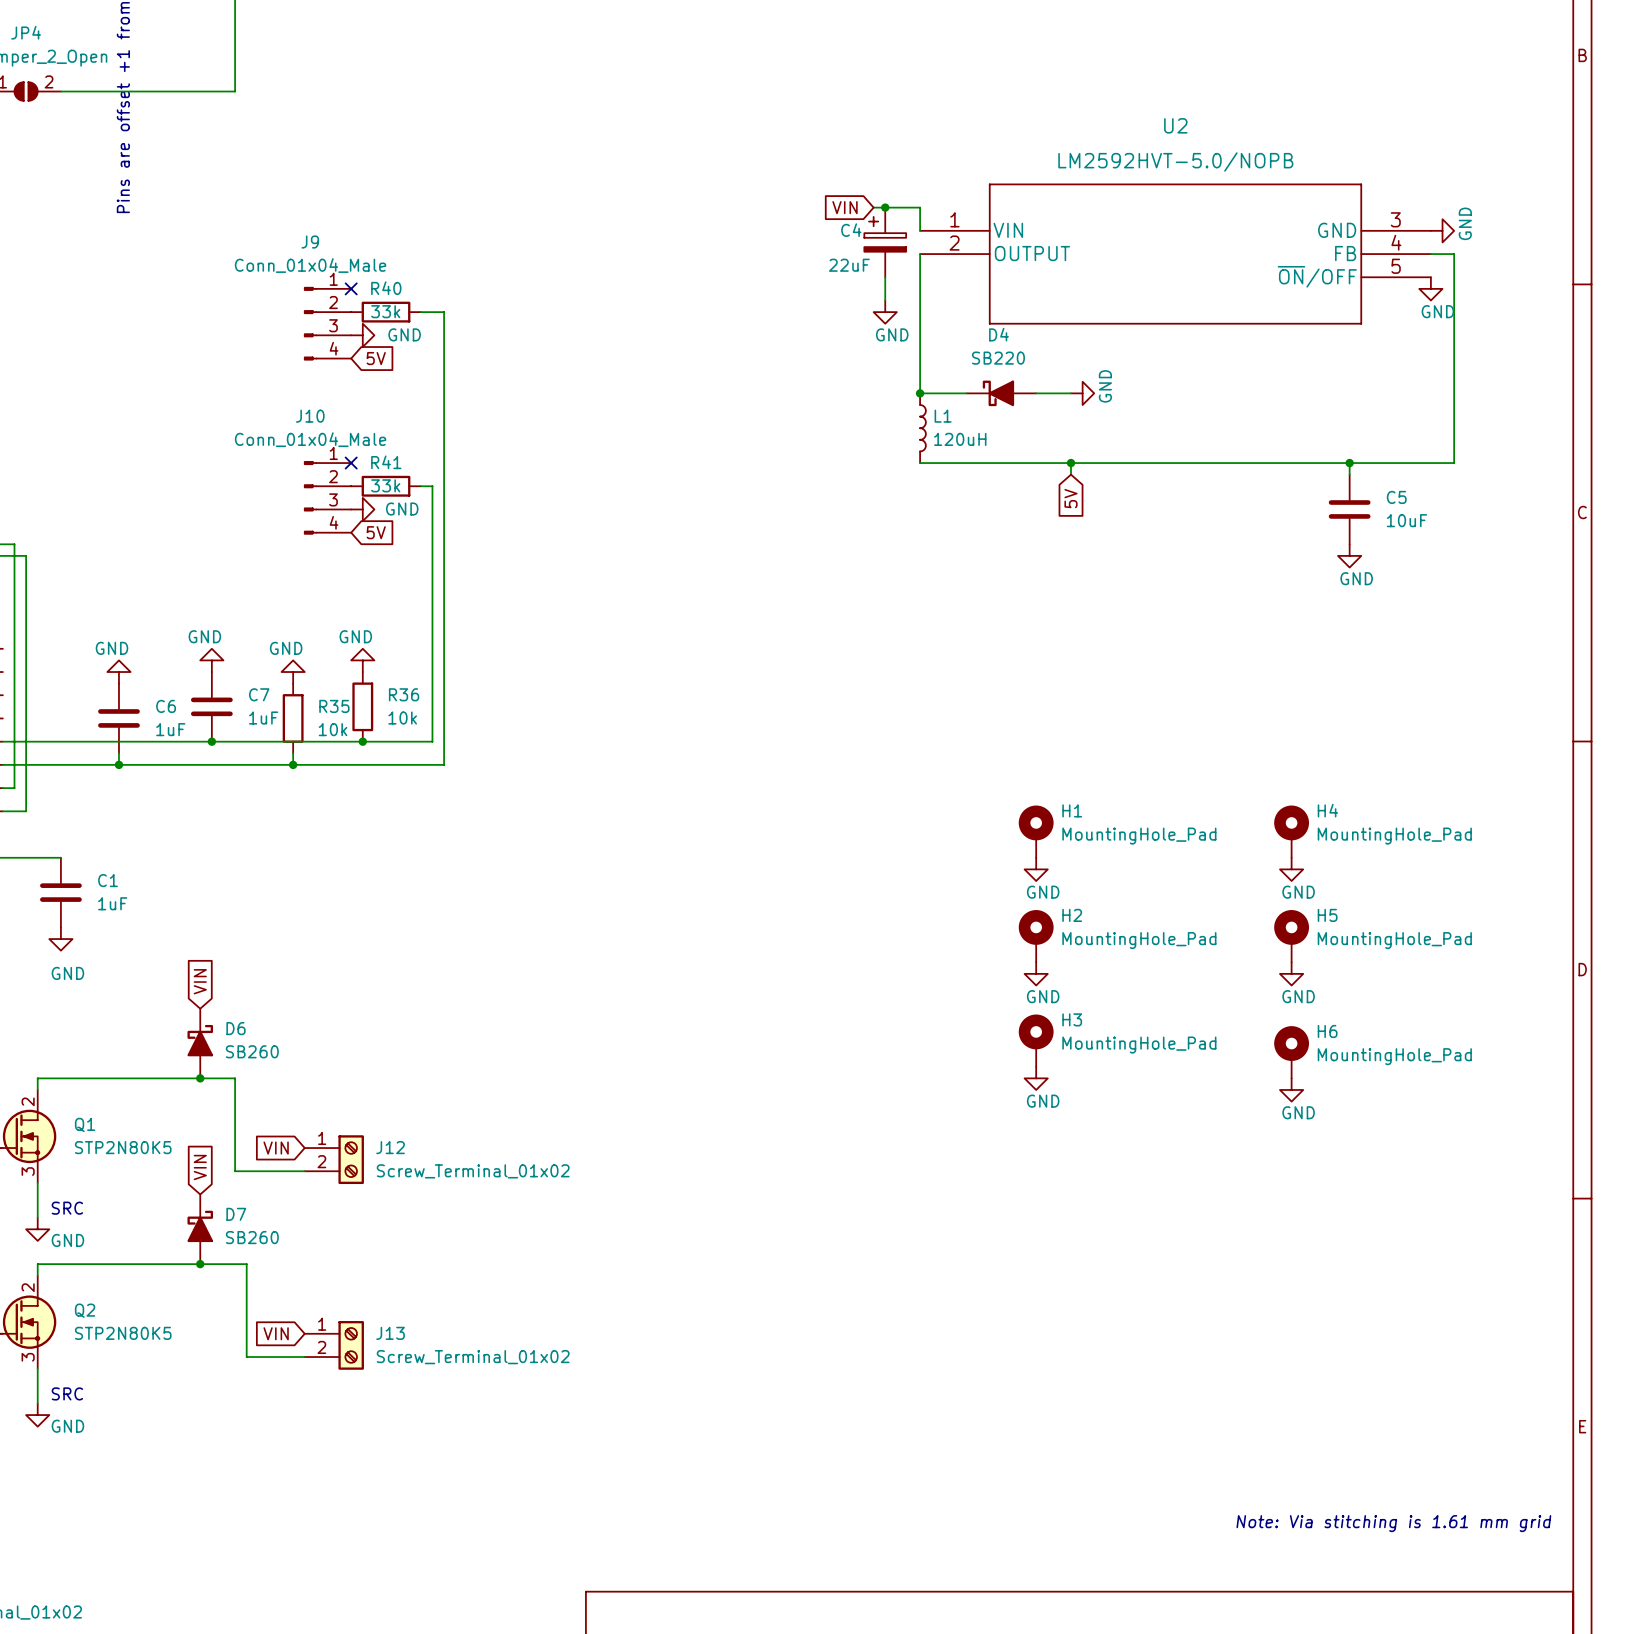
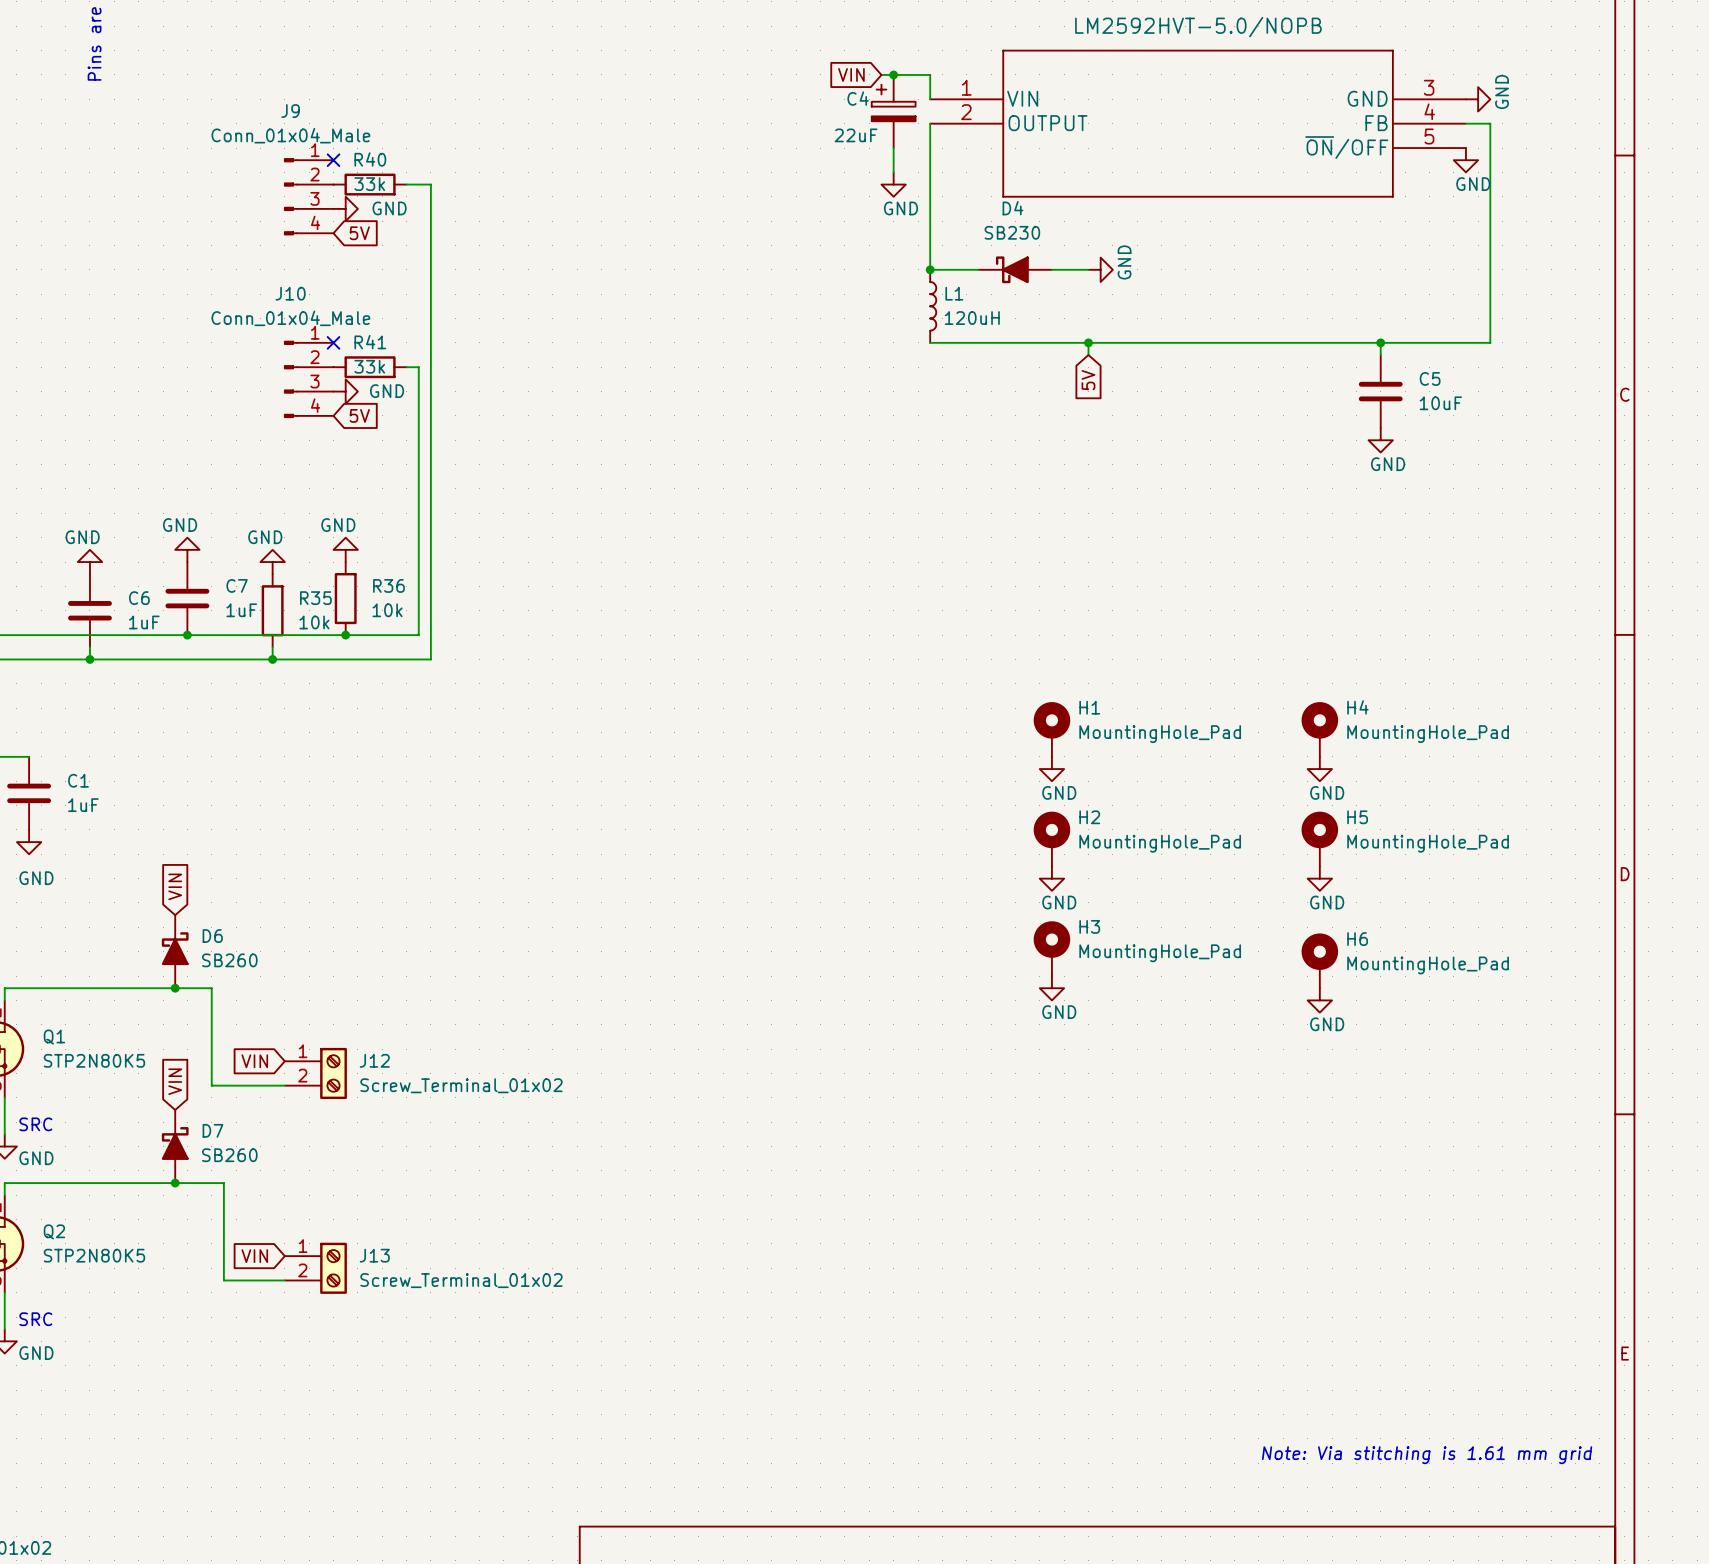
D4 value: SB220 (998, 358) -> SB230 (1012, 232)

